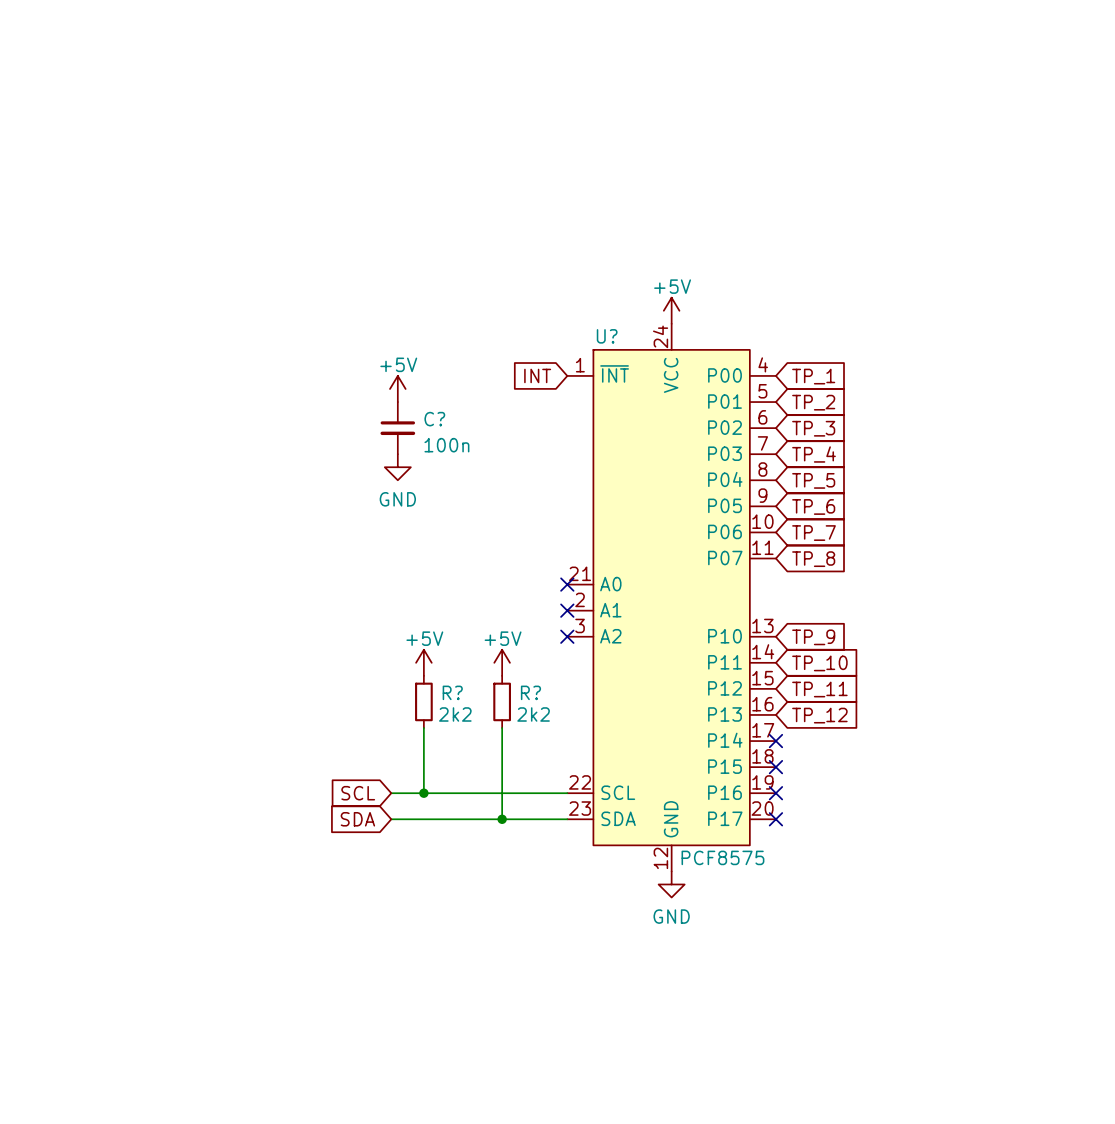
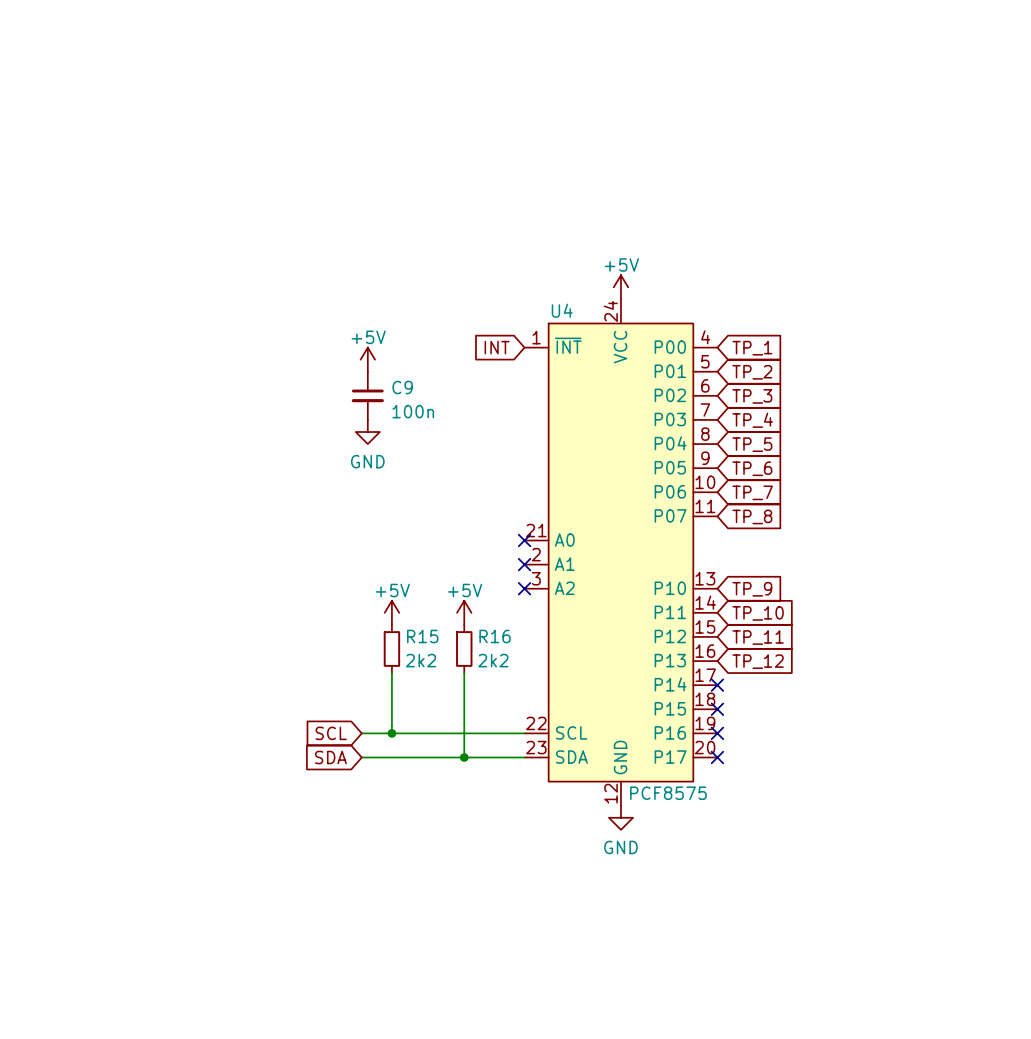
U? name: U? (607, 336) -> U4 (562, 310)
C? name: C? (434, 419) -> C9 (402, 387)
R? name: R? (452, 692) -> R15 (422, 636)
R? name: R? (530, 692) -> R16 (495, 636)

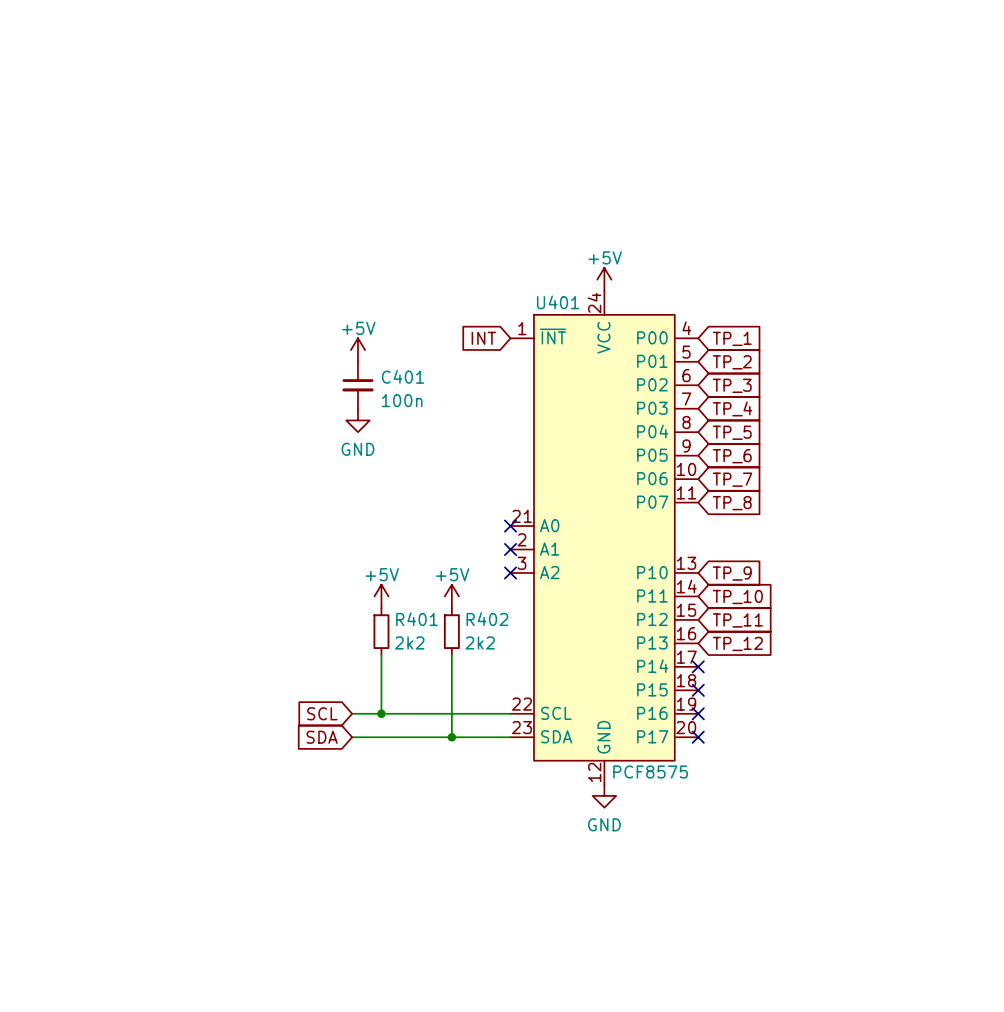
U4 name: U4 (562, 310) -> U401 (558, 302)
C9 name: C9 (402, 387) -> C401 (403, 376)
R15 name: R15 (422, 636) -> R401 (417, 619)
R16 name: R16 (495, 636) -> R402 (487, 619)

